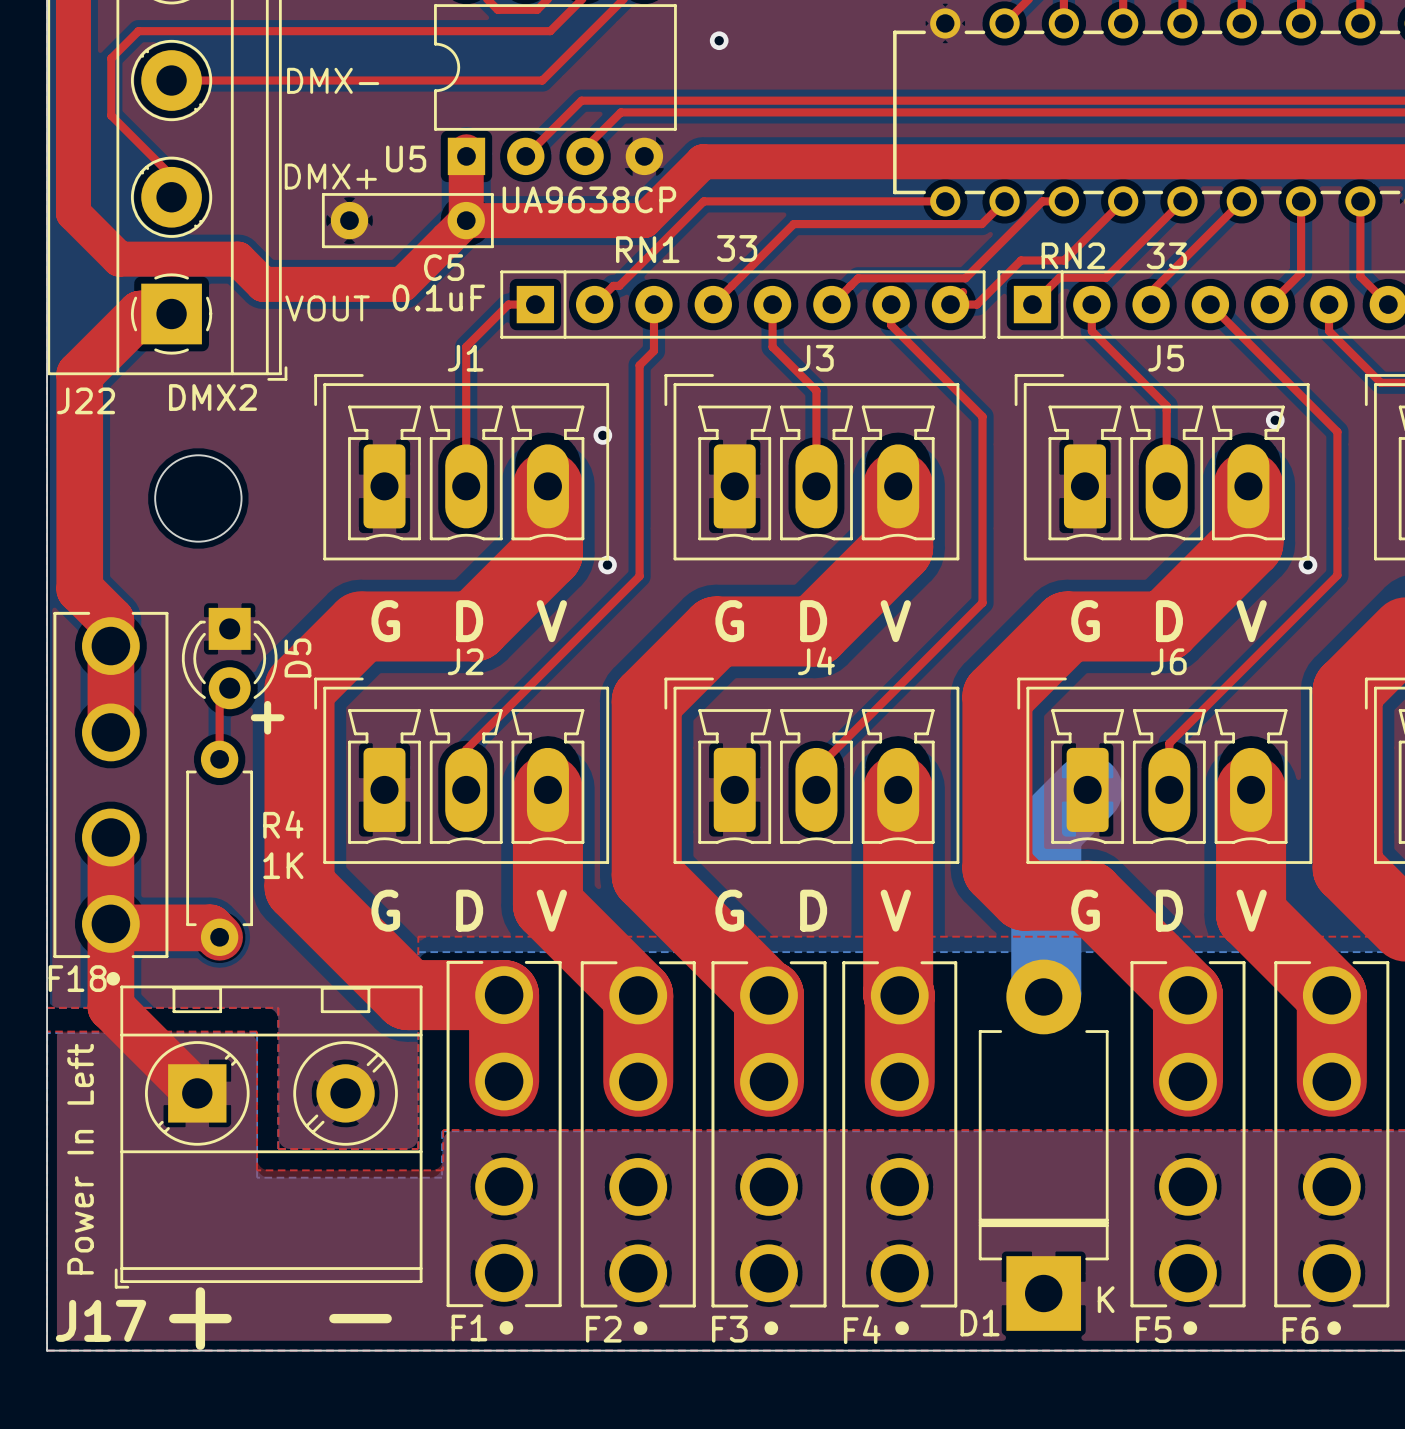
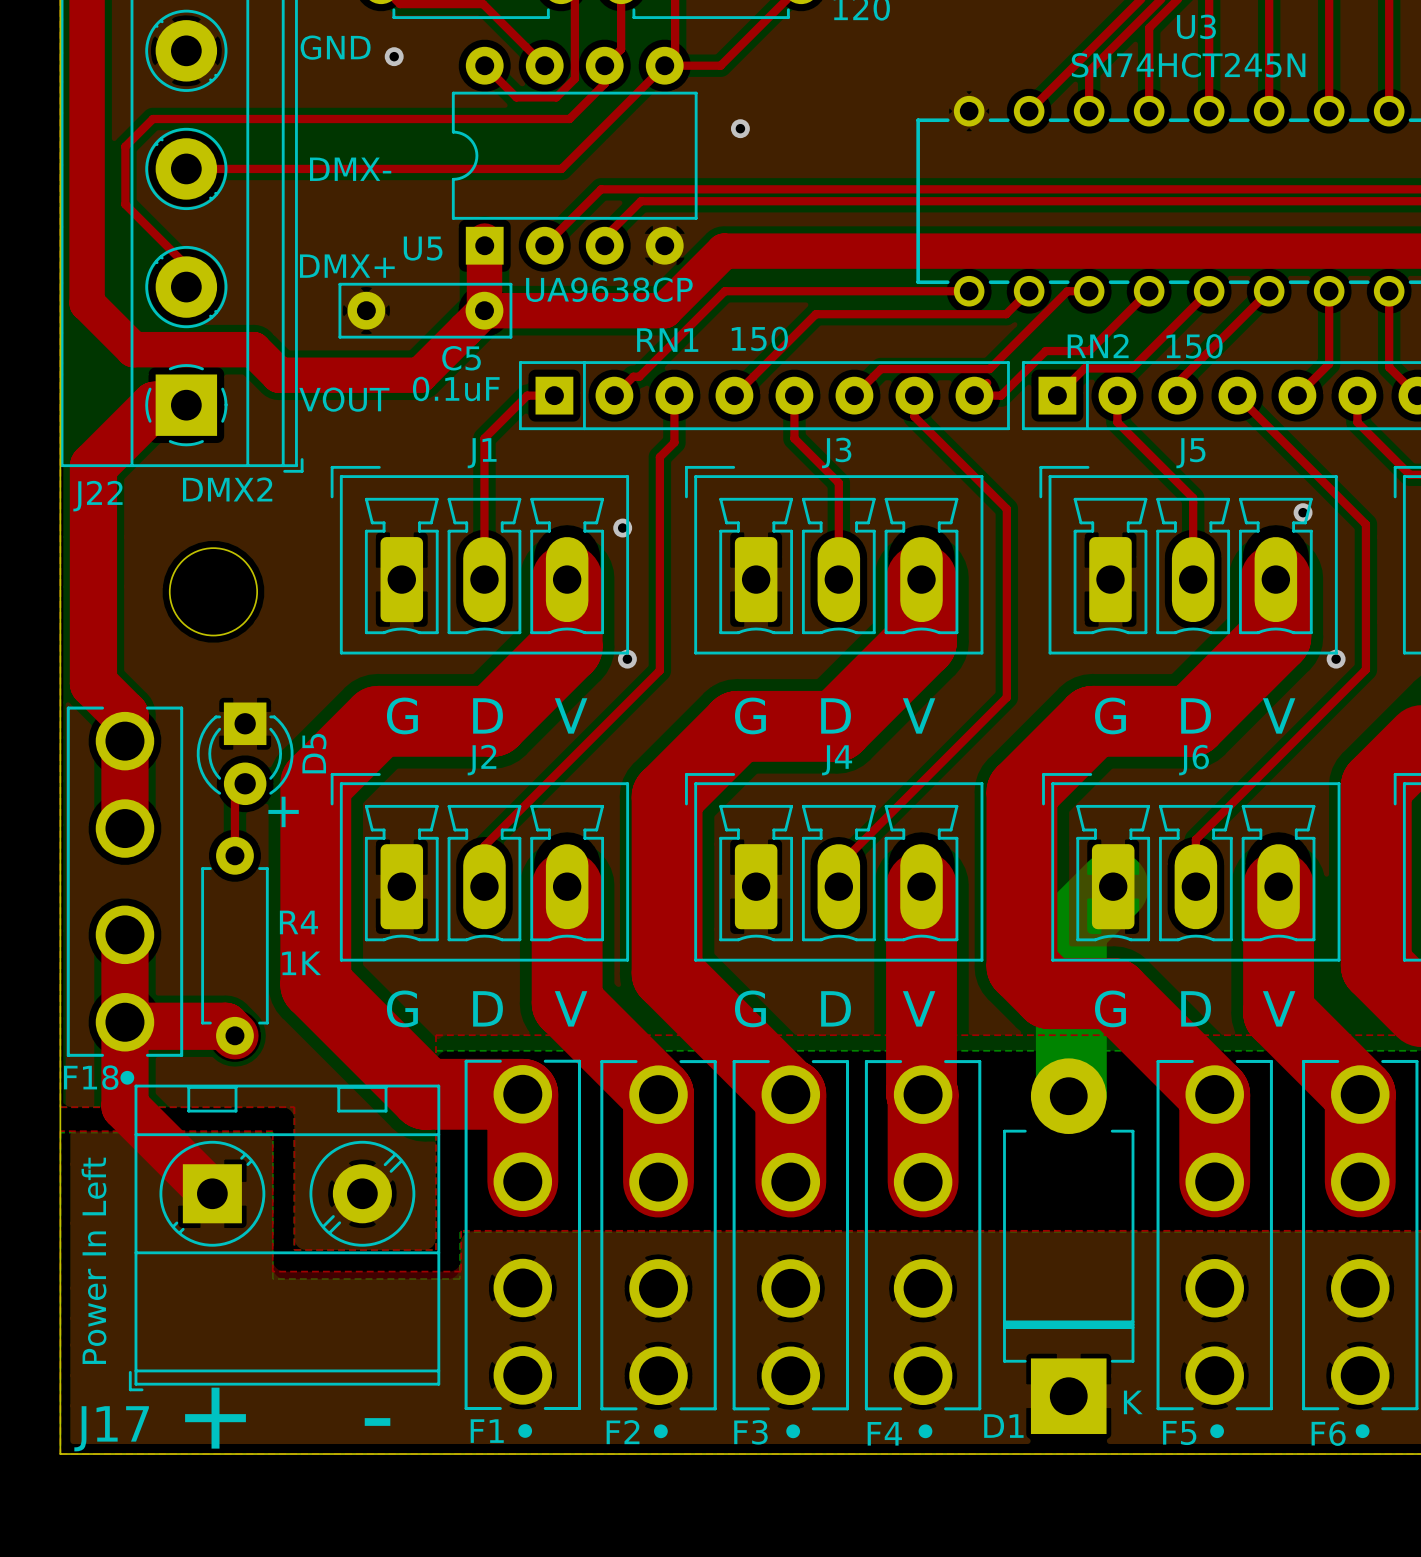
RN1 value: 33 (737, 248) -> 150 (759, 338)
RN2 value: 33 (1166, 255) -> 150 (1194, 346)

